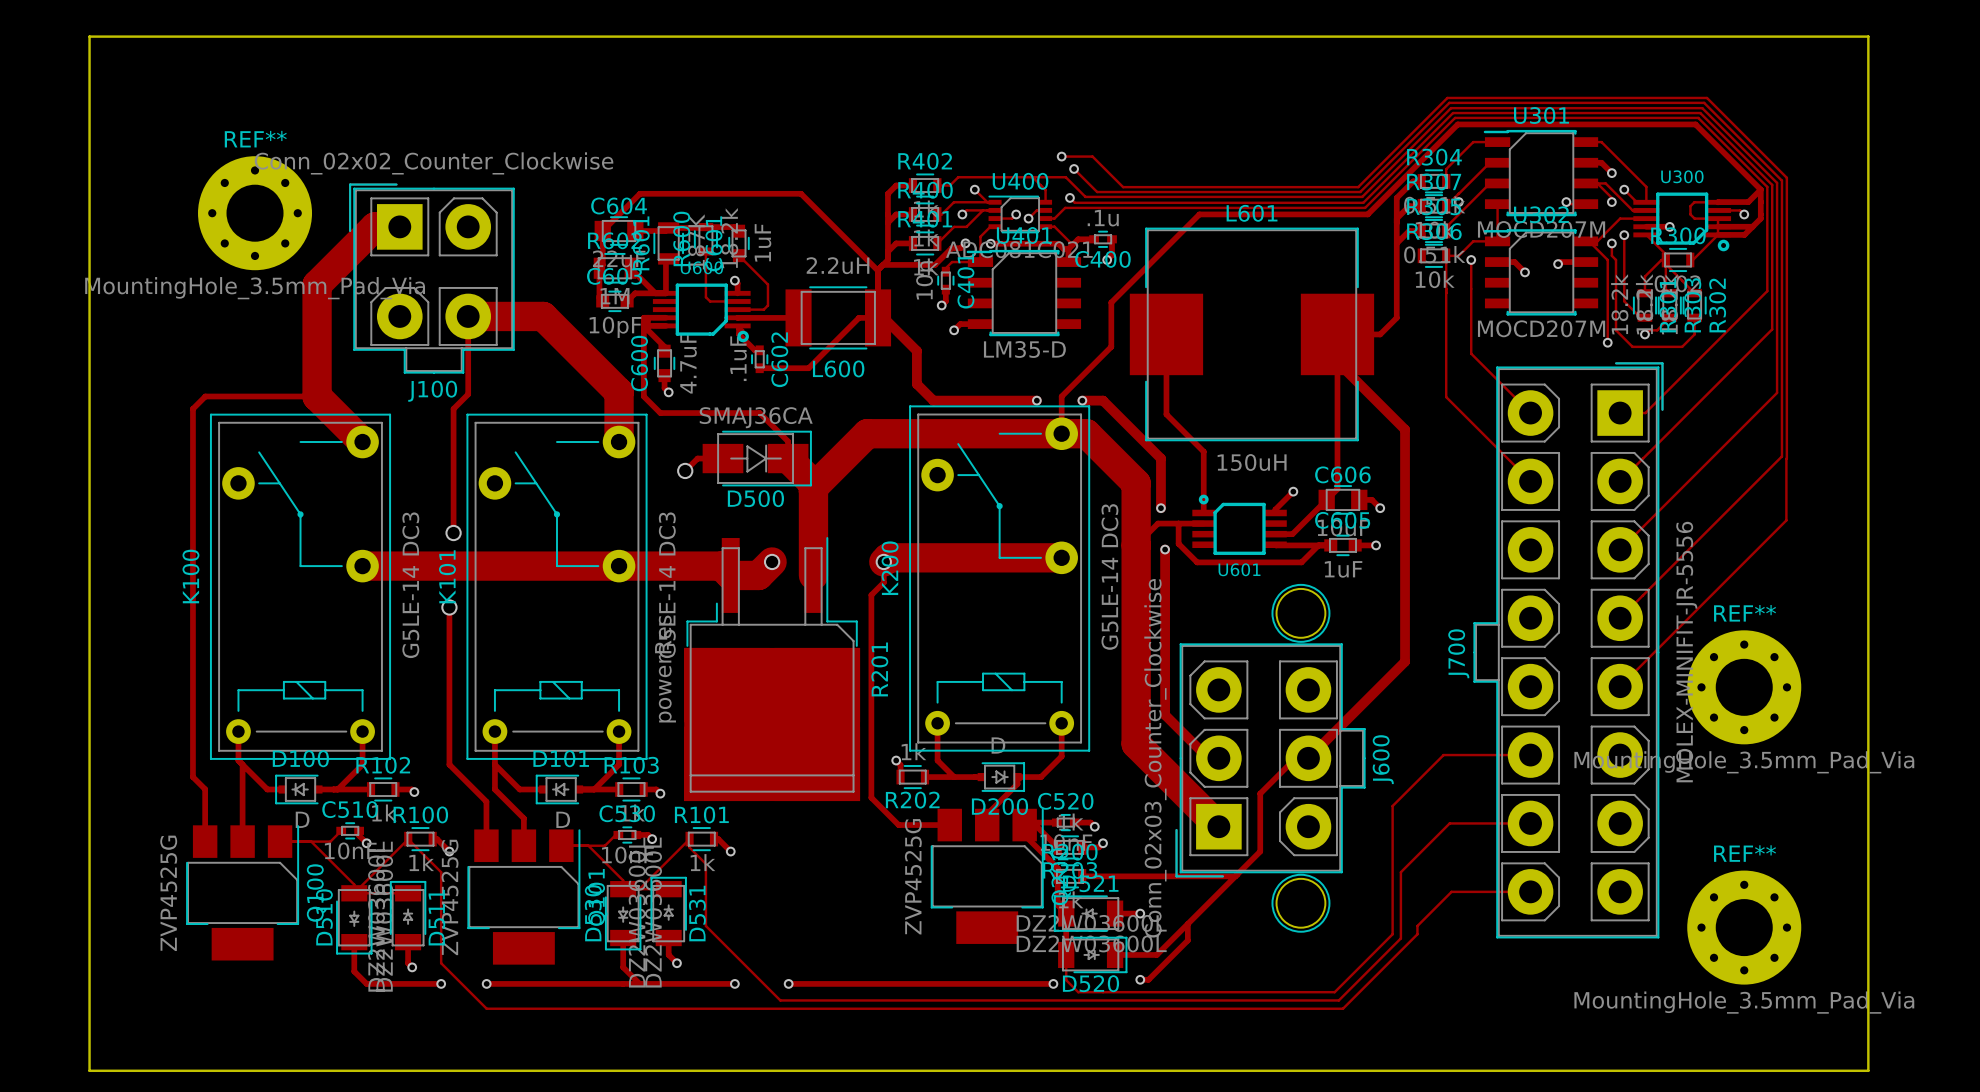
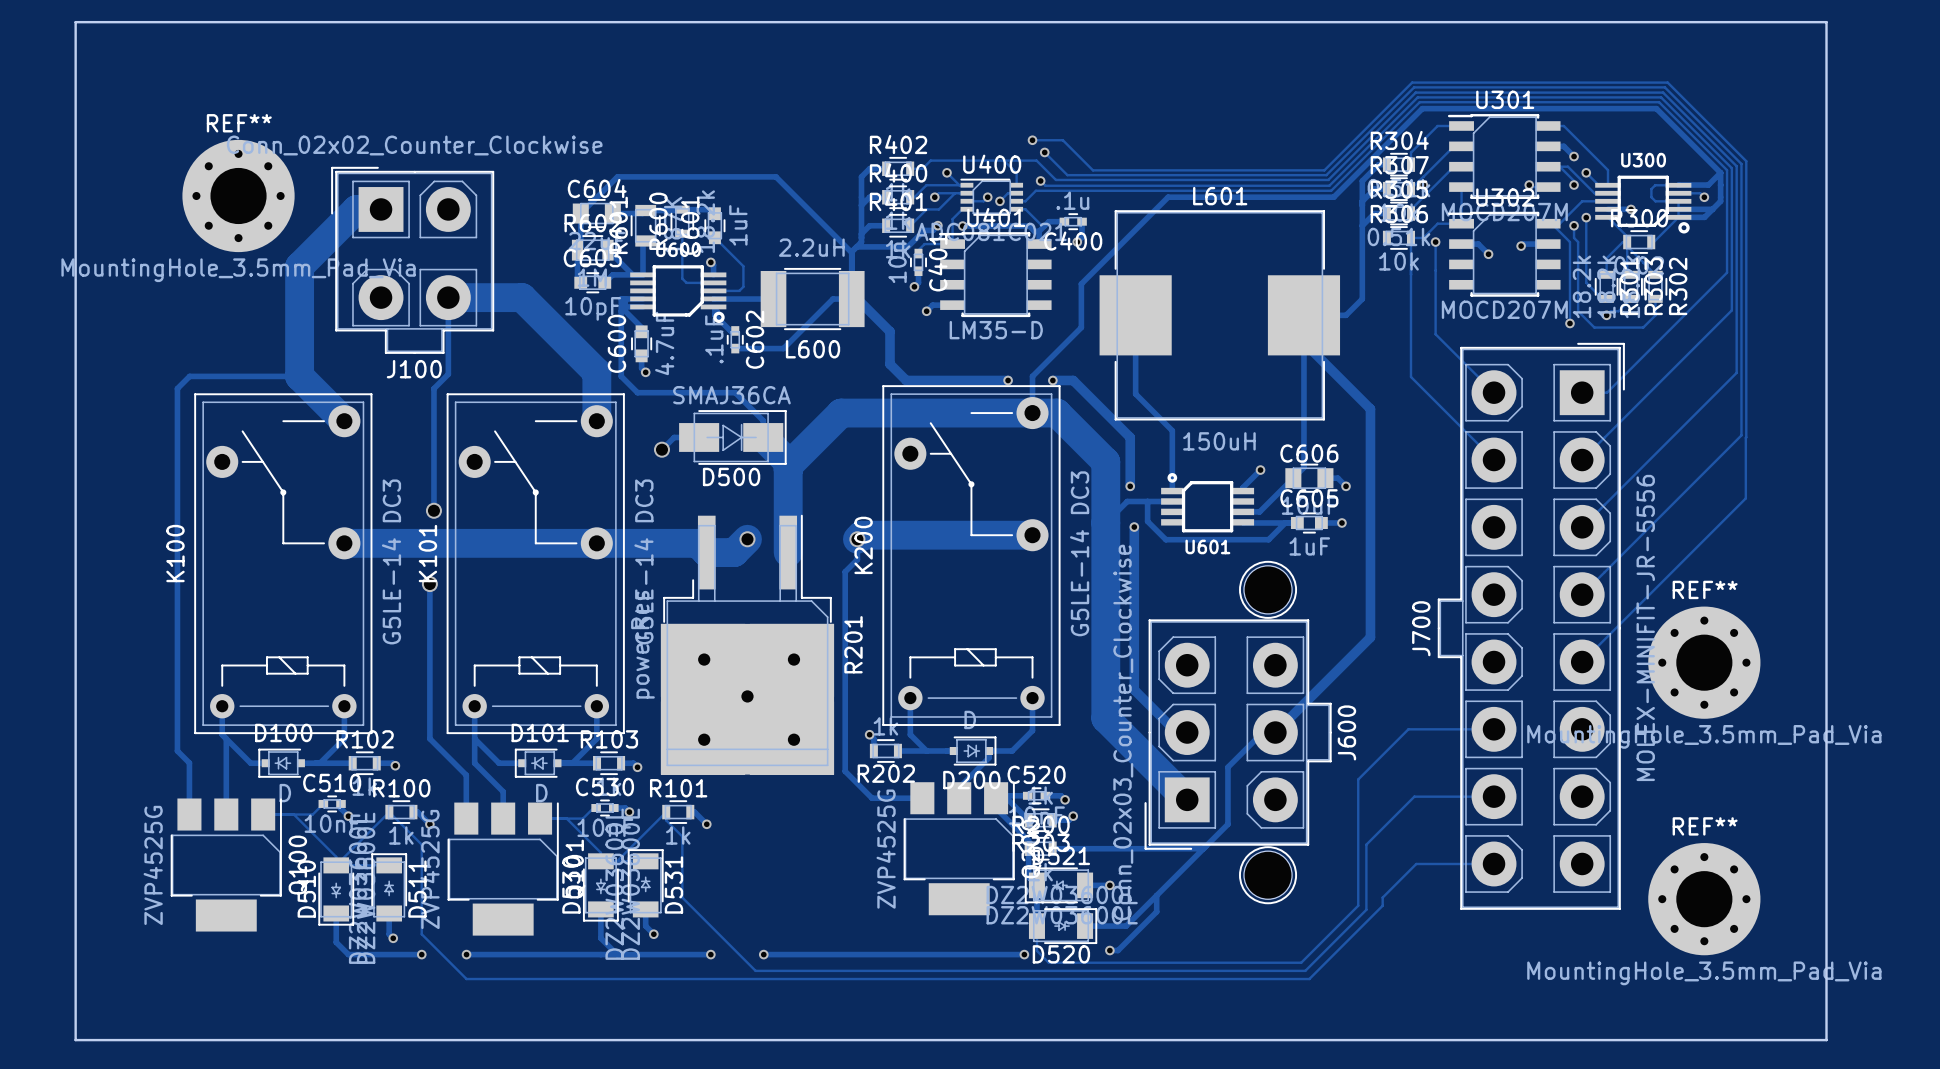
R201 footprint: [684, 537, 861, 802] -> [660, 514, 835, 775]

